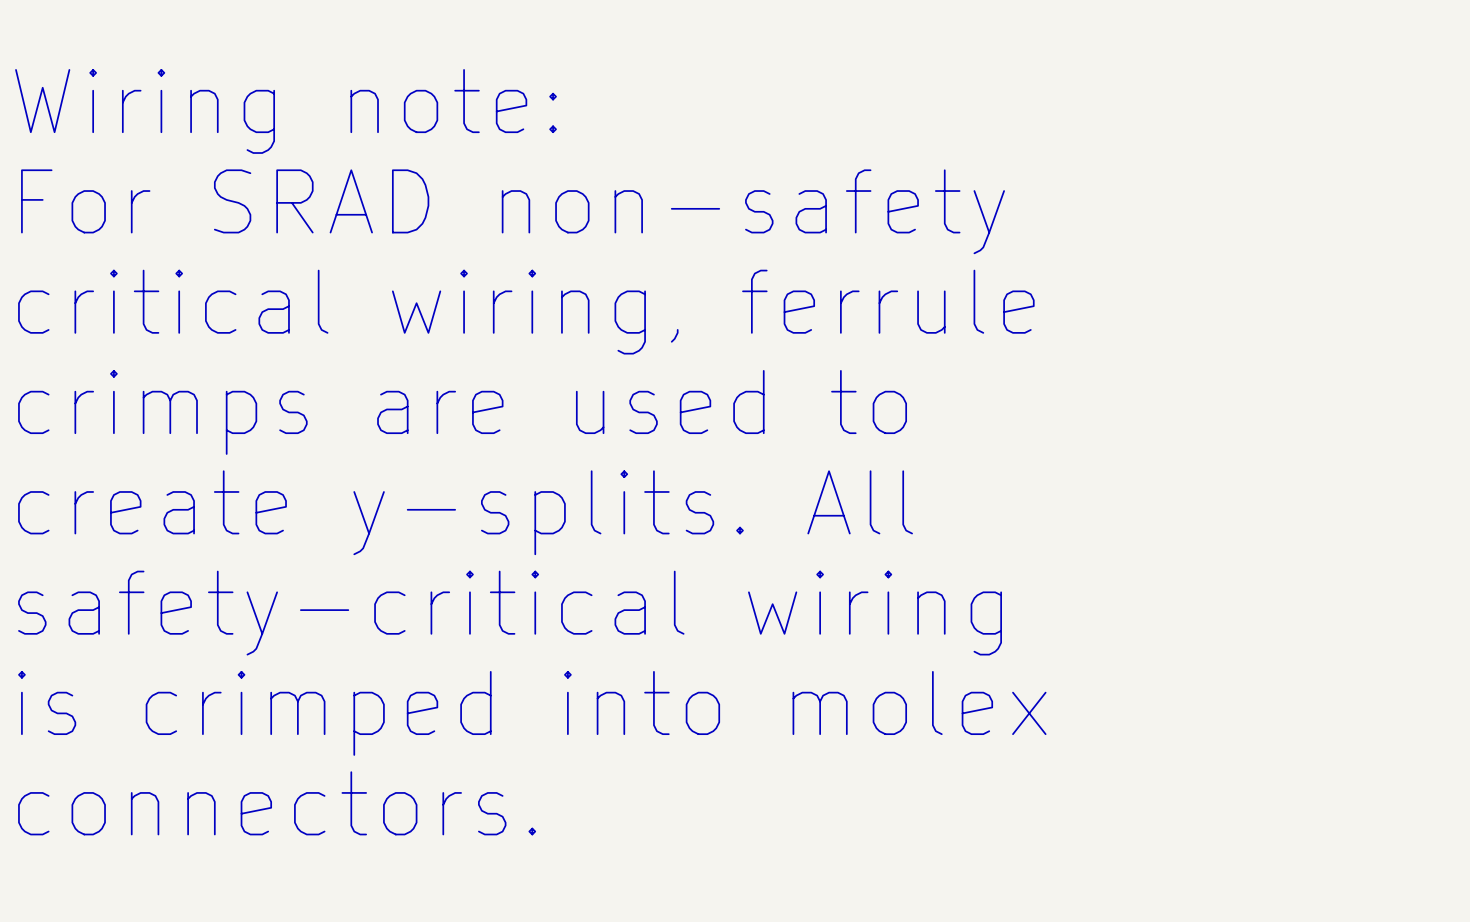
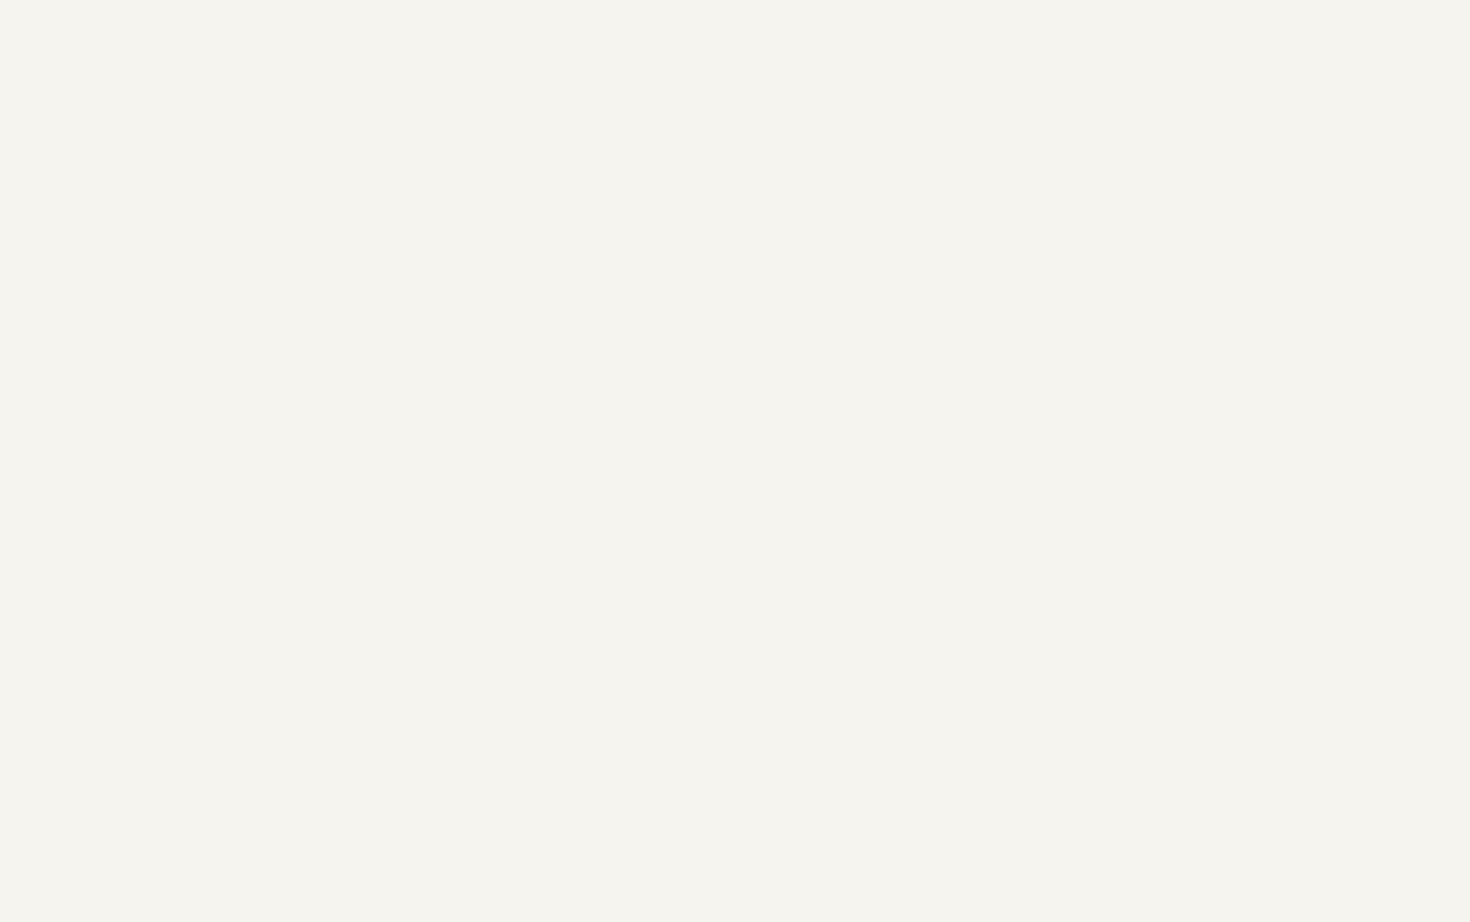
text: Wiring note: (286, 111) -> none
text: For SRAD non-safety (513, 211) -> none
text: critical wiring, ferrule (526, 312) -> none
text: crimps are used to (462, 412) -> none
text: create y-splits. All (465, 512) -> none
text: safety-critical wiring (510, 613) -> none
text: is crimped into molex (532, 713) -> none
text: connectors. (277, 803) -> none

